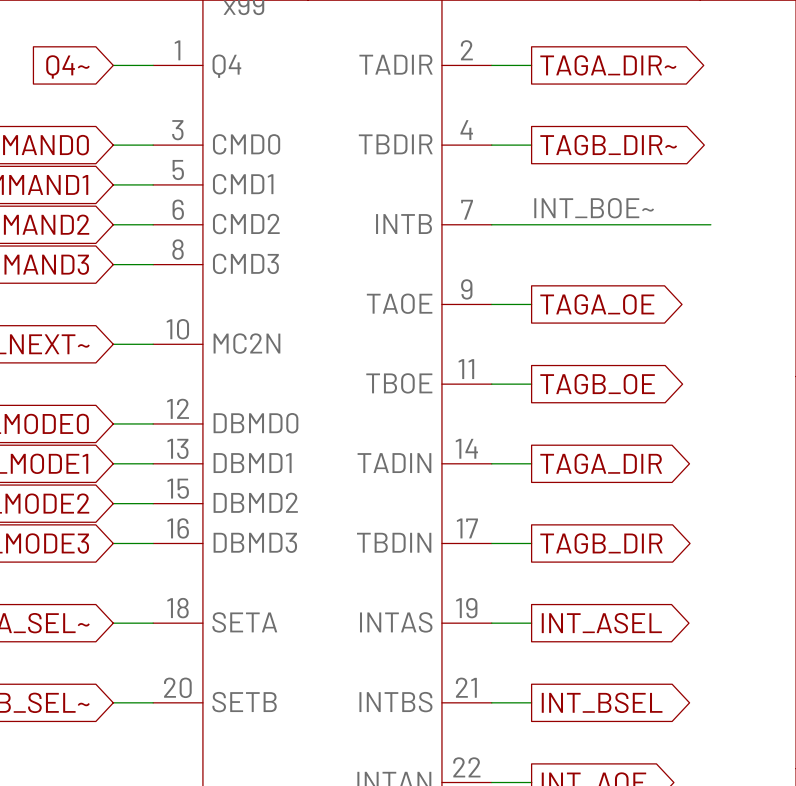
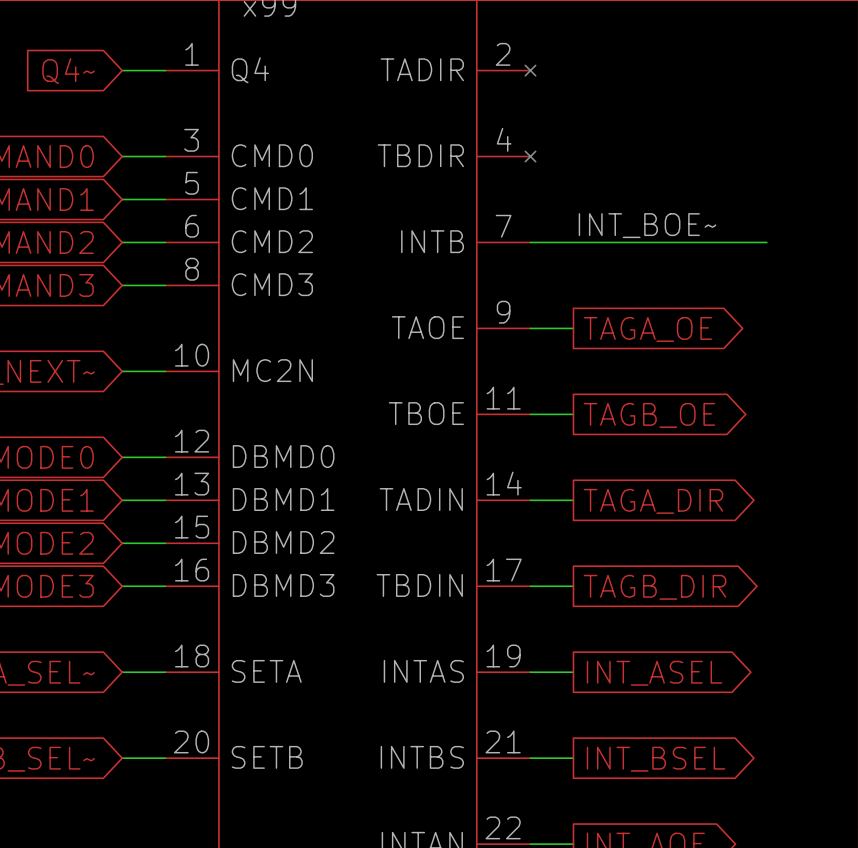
wire: (491, 65) (531, 65) -> none
no-connect mark: none -> (530, 70)
global label: TAGA_DIR~ (608, 65) -> none
wire: (491, 145) (531, 145) -> none
no-connect mark: none -> (530, 156)
global label: TAGB_DIR~ (608, 145) -> none

